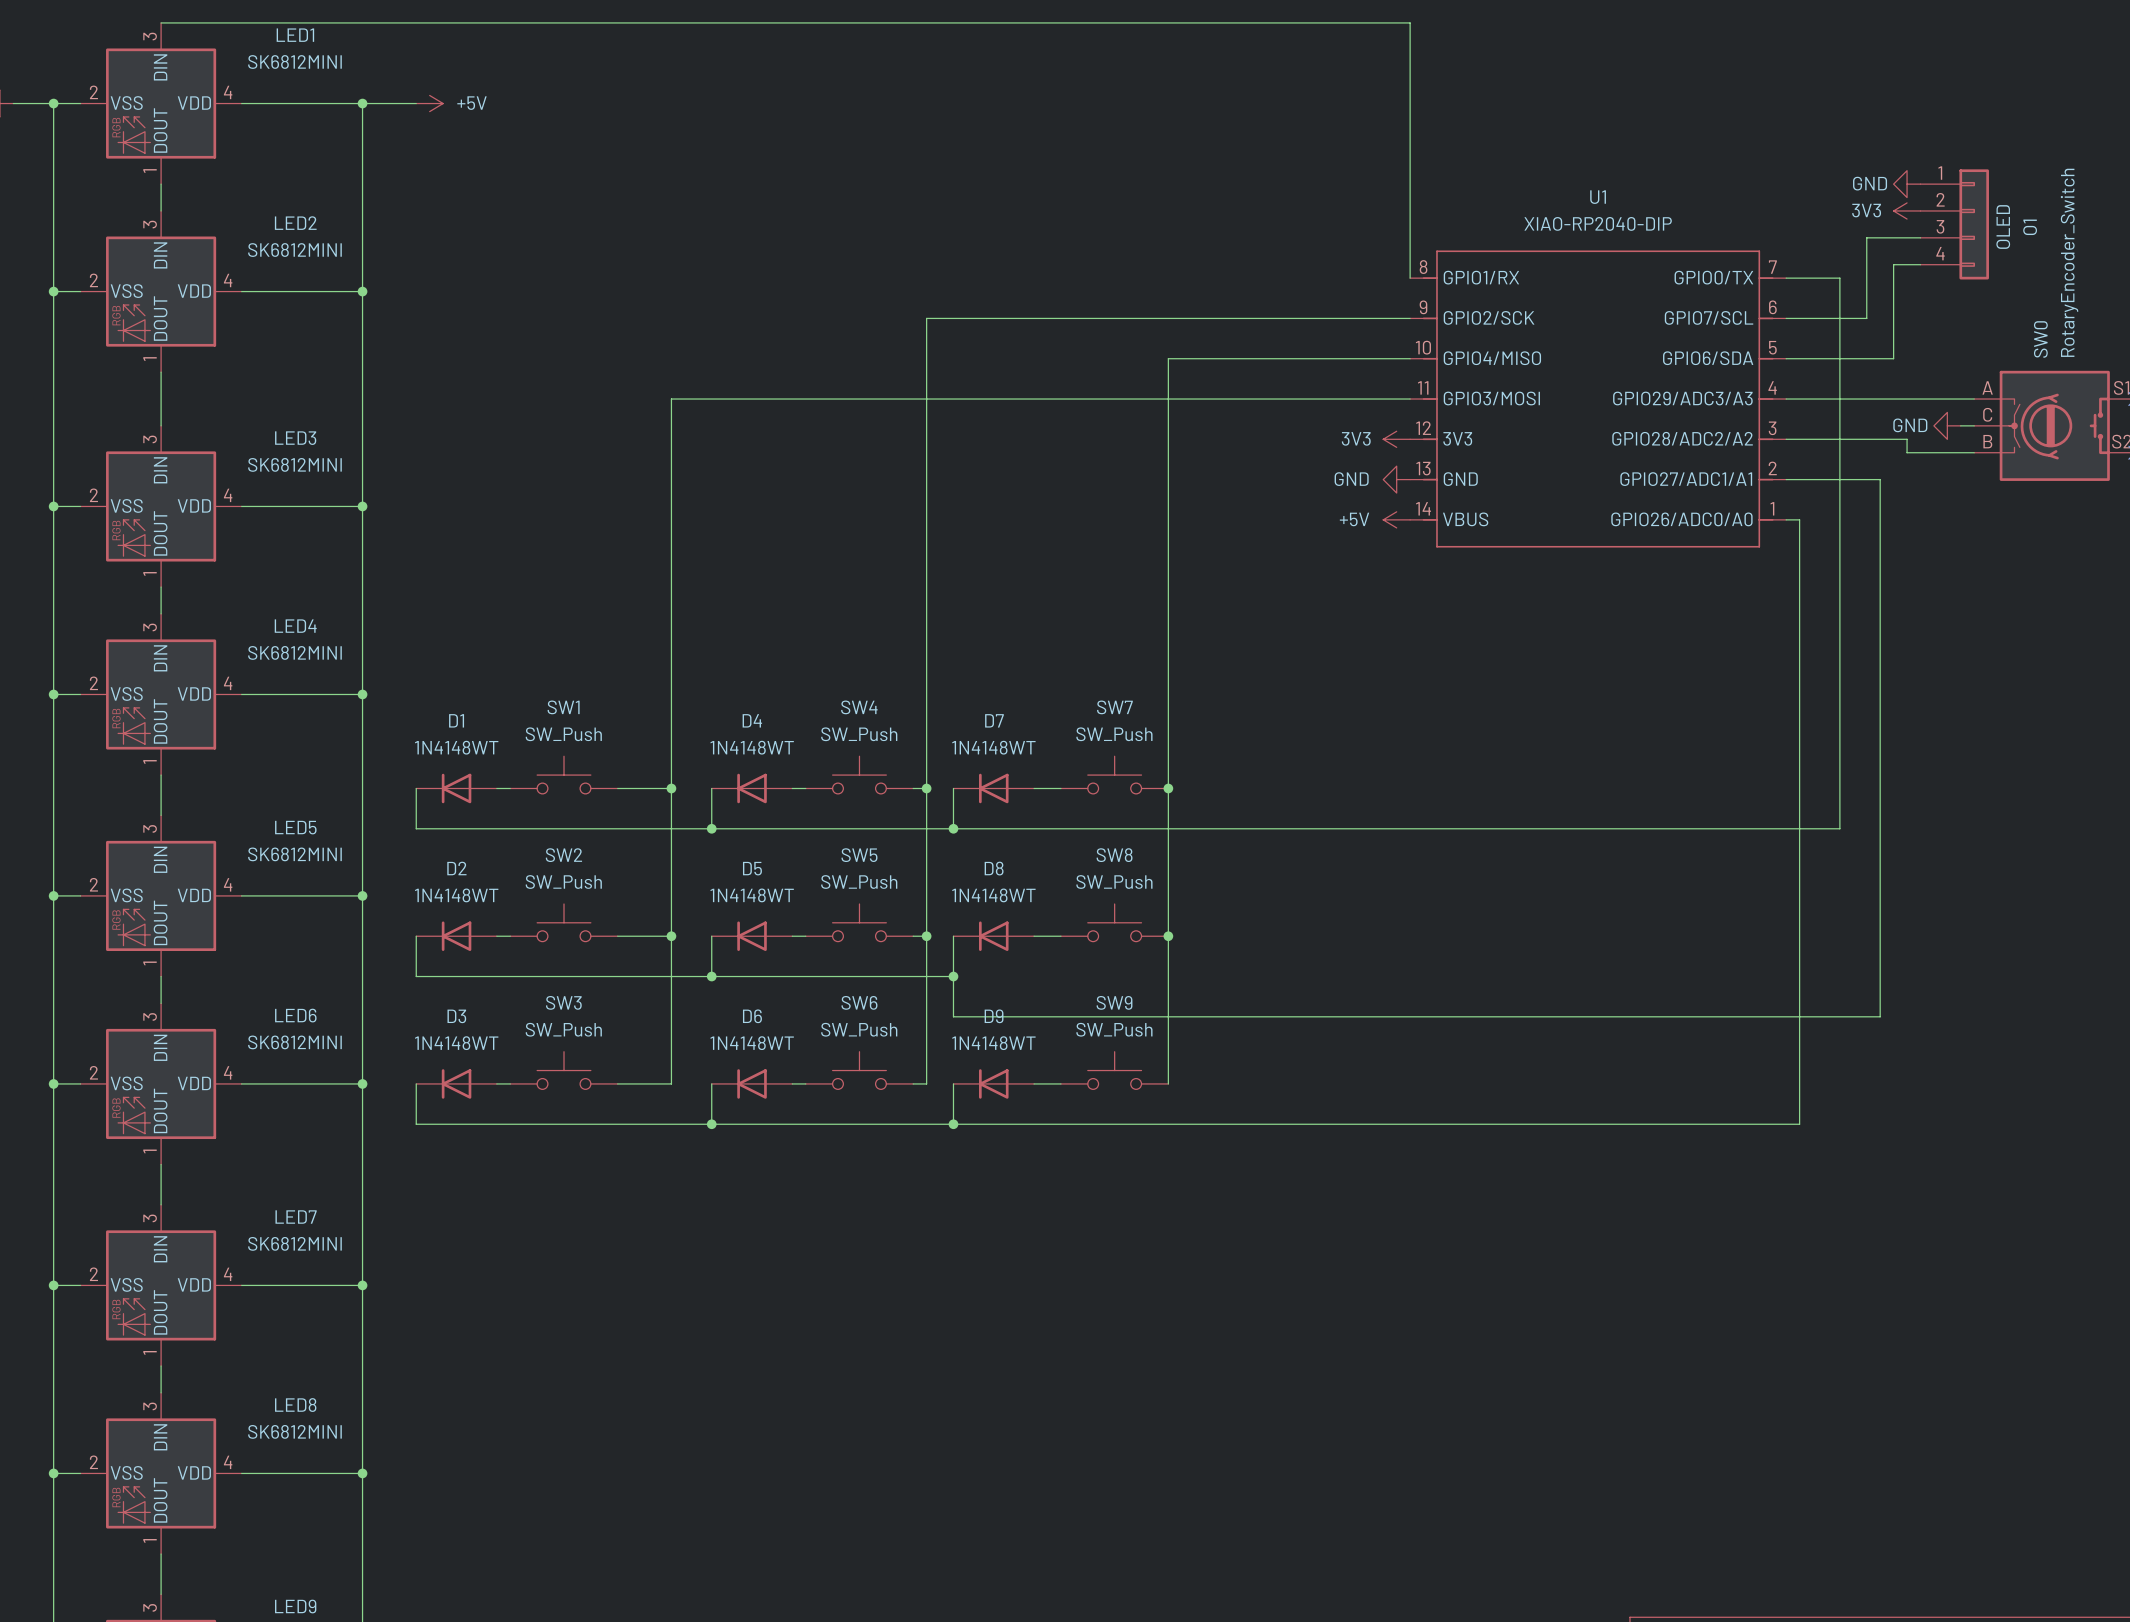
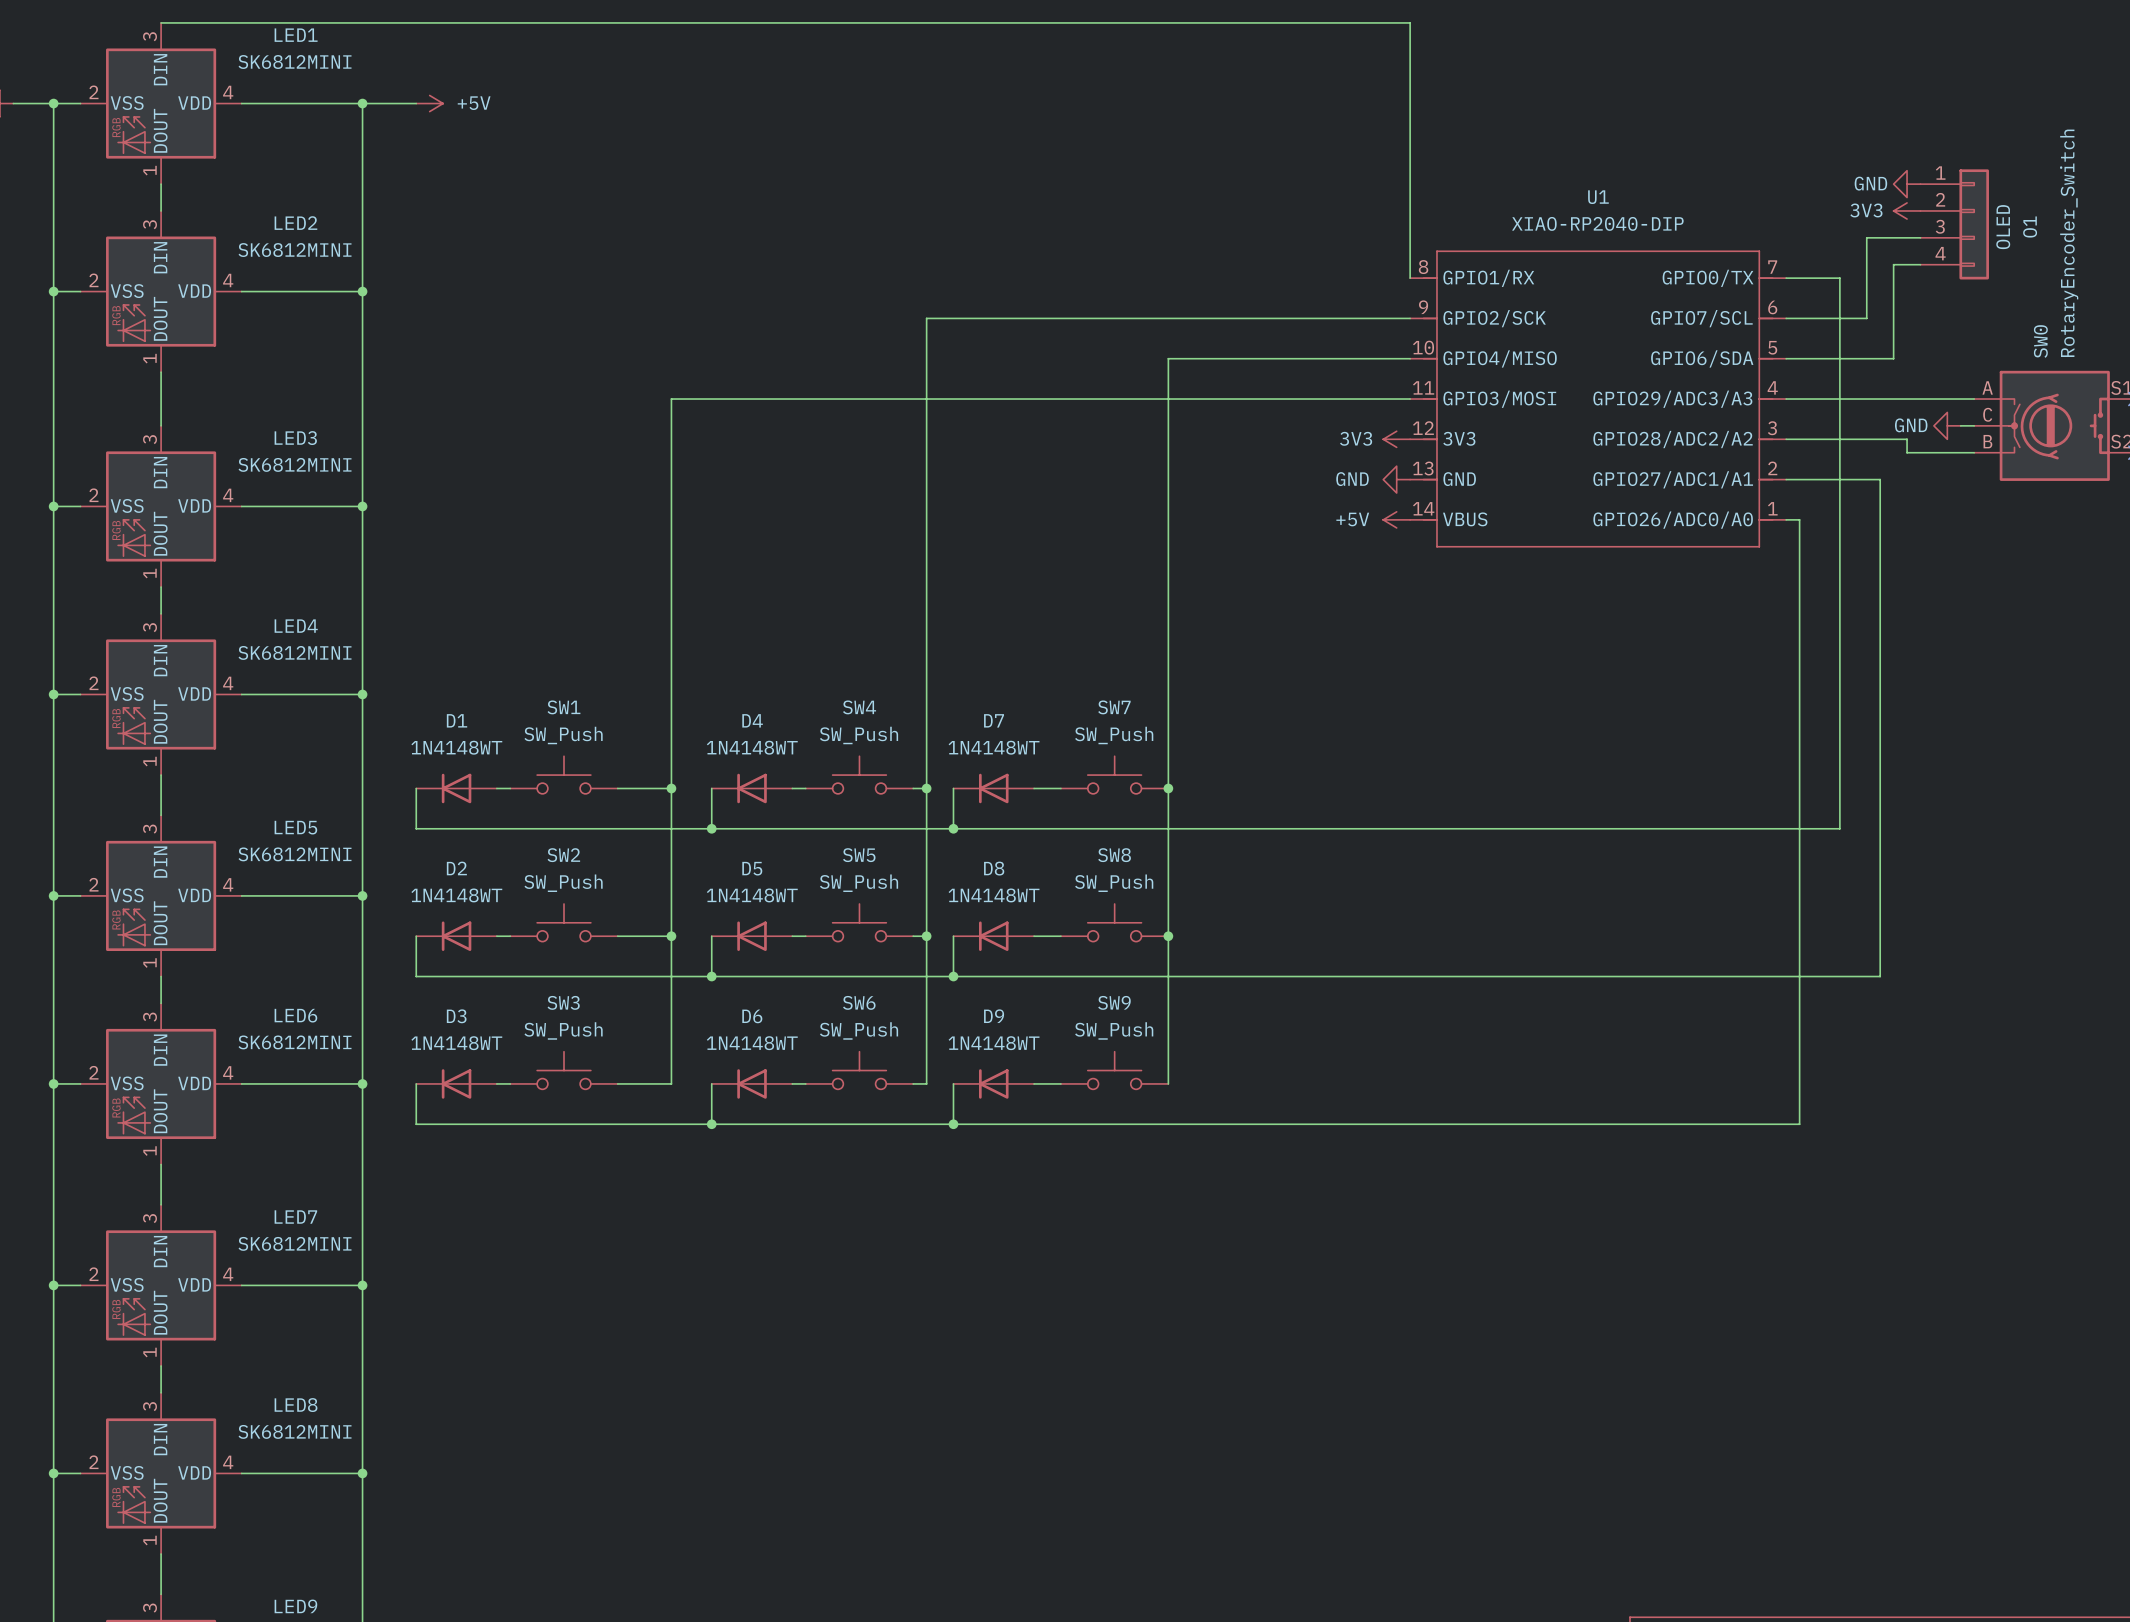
wire: (953, 976) (953, 1016) (1880, 1016) (1880, 976) -> (953, 976) (1880, 976)

